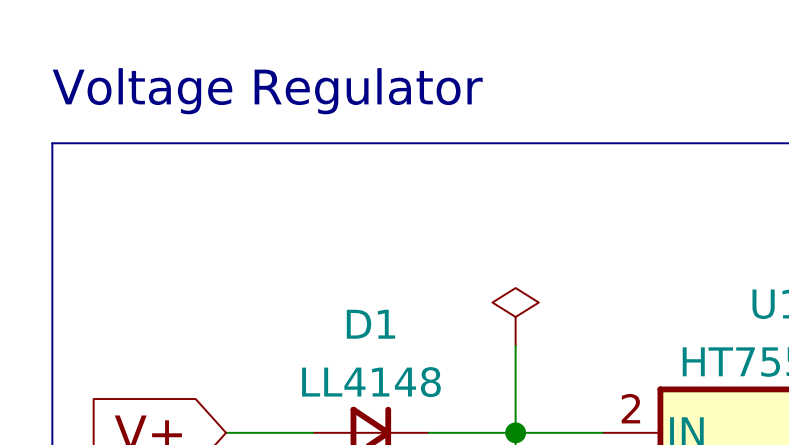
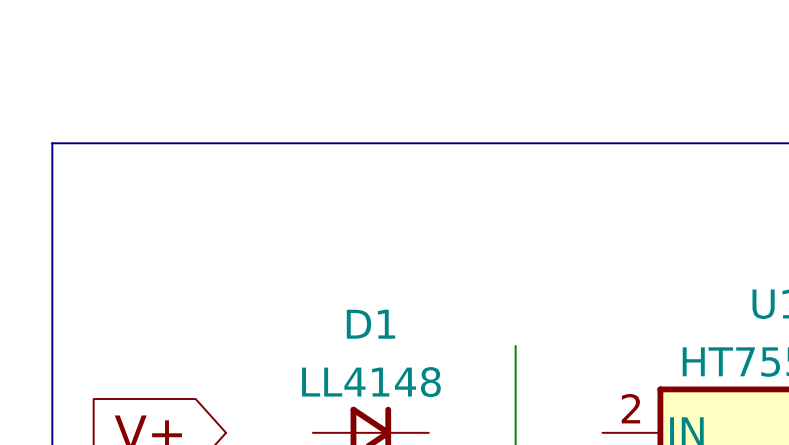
text: Voltage Regulator (267, 91) -> none
power symbol: (515, 317) -> none
wire: (226, 432) (312, 432) -> none
wire: (428, 432) (602, 432) -> none
junction: (515, 432) -> none

